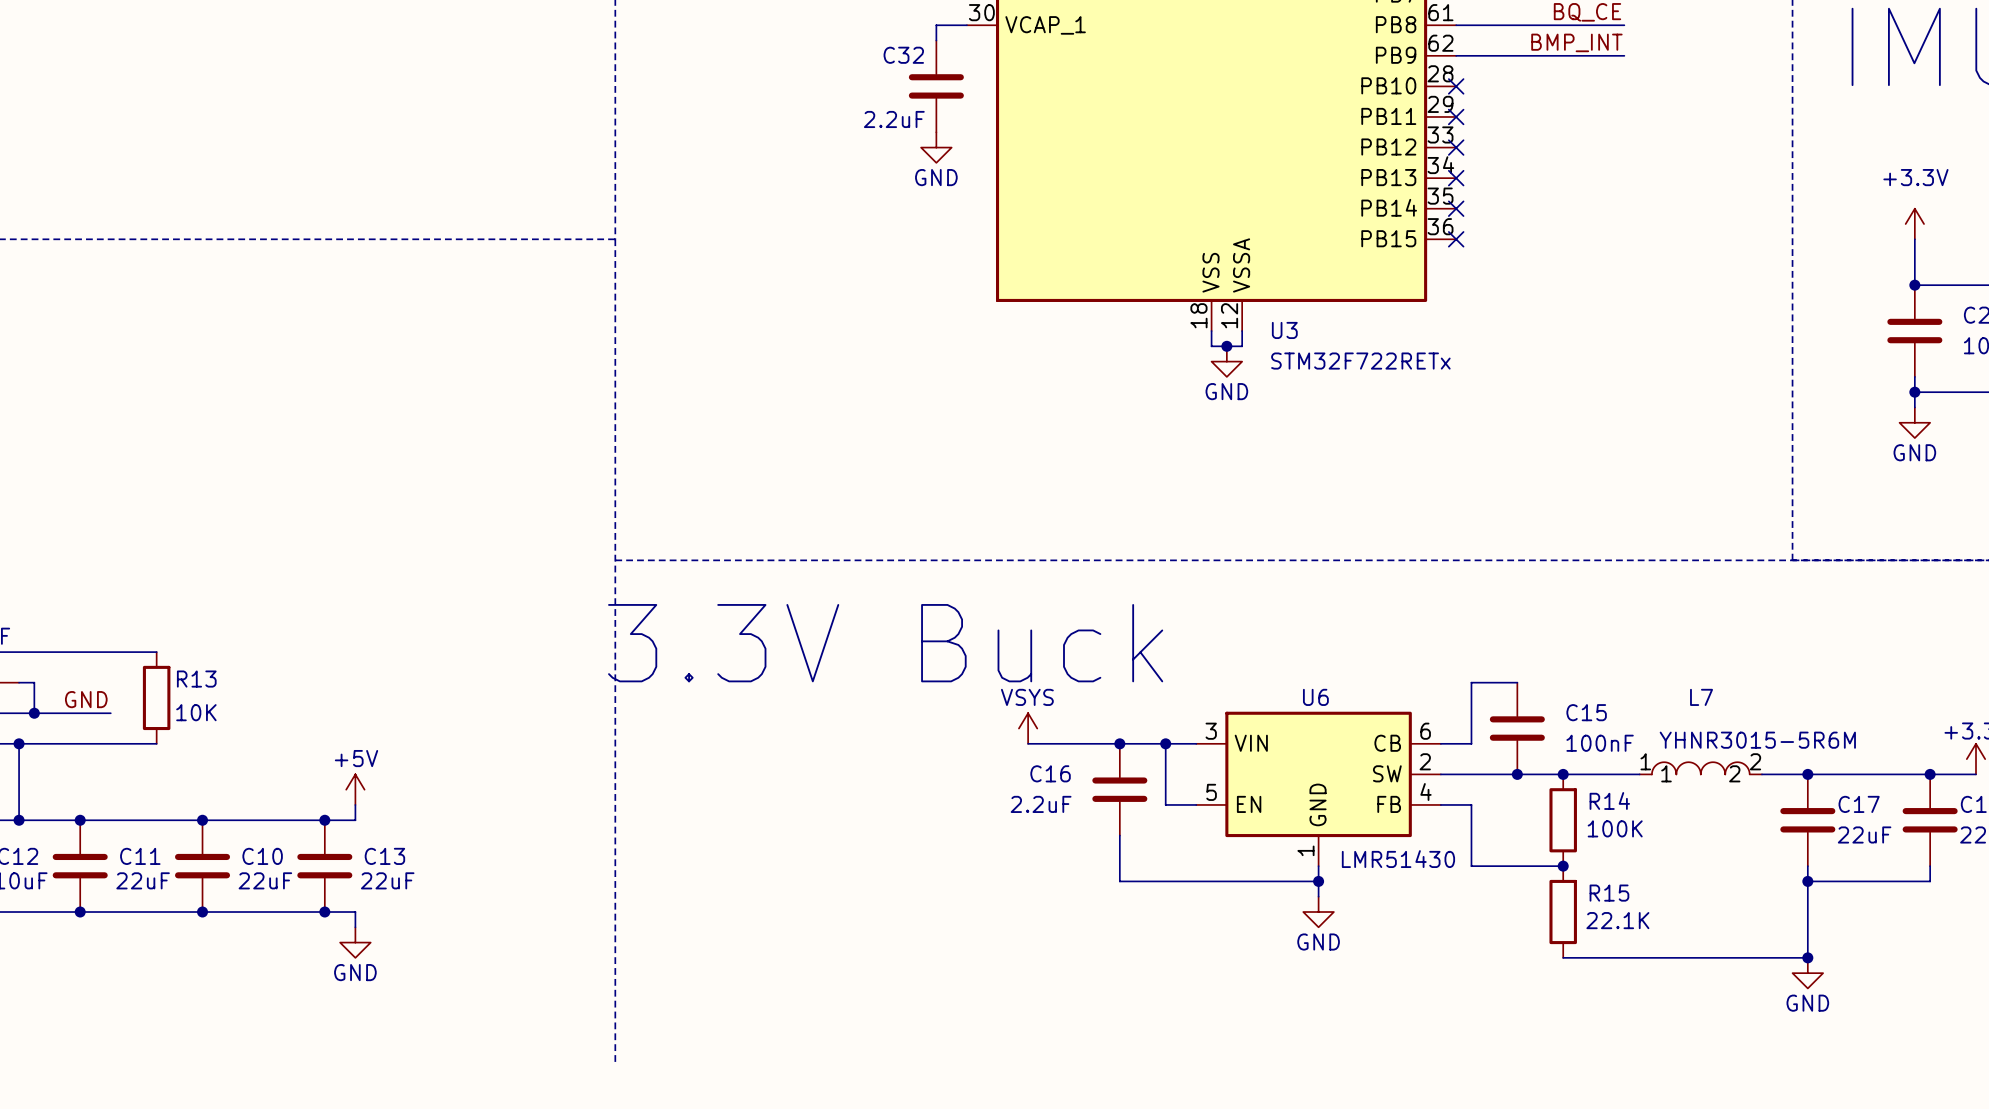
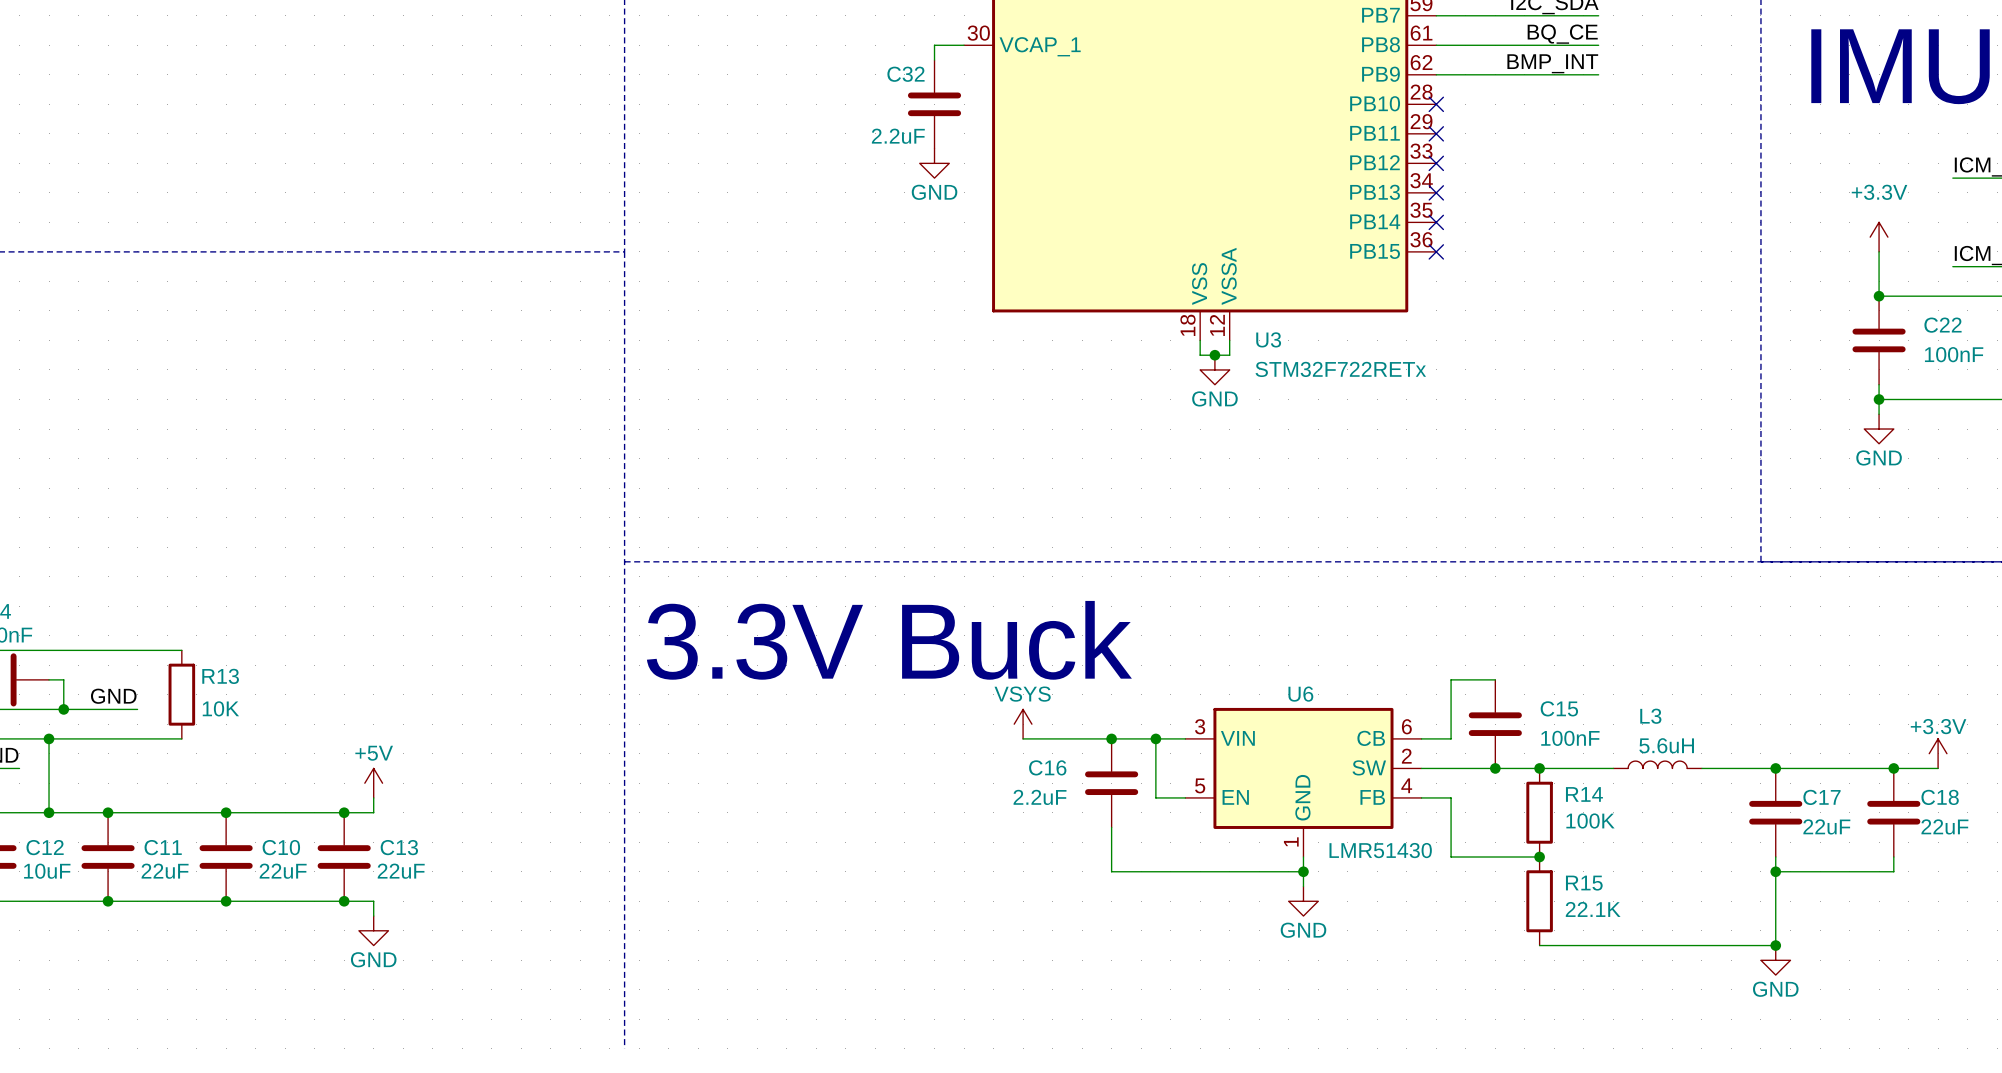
L7: YHNR3015-5R6M (1700, 768) -> none
L3: none -> 5.6uH (1657, 764)
wire: none -> (1701, 768) (1731, 768)

